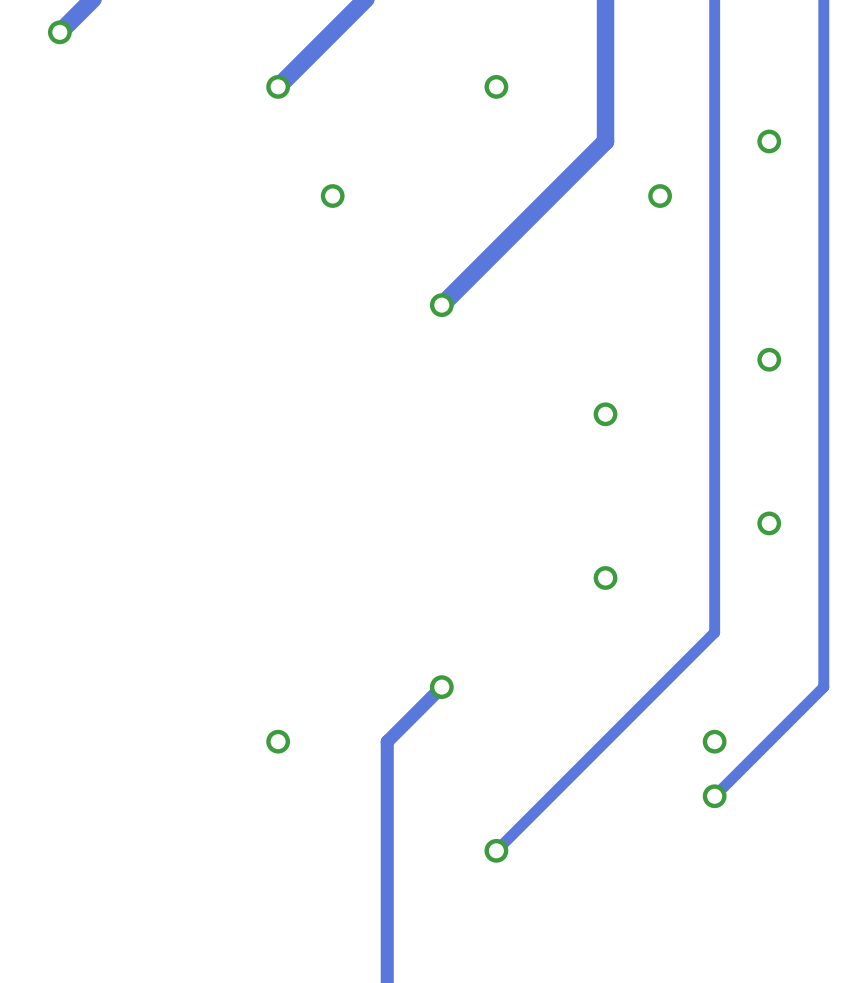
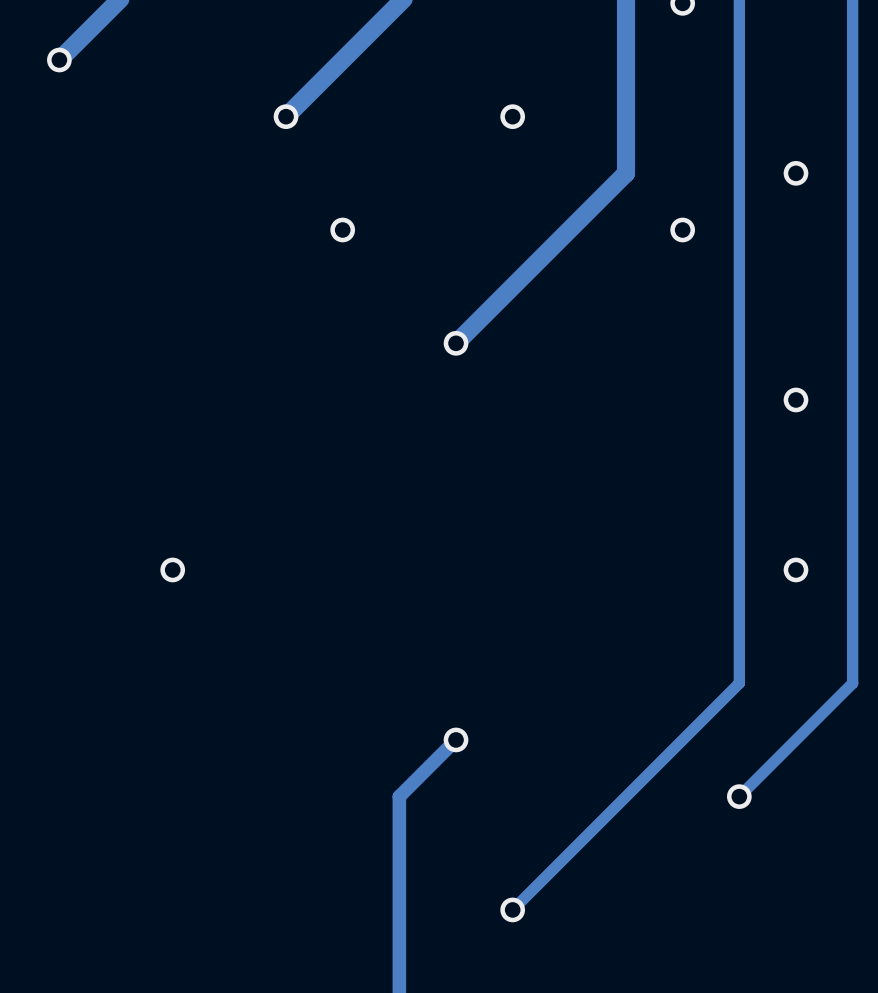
via: (605, 414) -> none
via: none -> (172, 569)
via: (605, 577) -> none
track: (823, 632) (823, 687) (714, 796) -> (852, 683) (739, 796)
via: (278, 741) -> none
via: (714, 796) -> none

